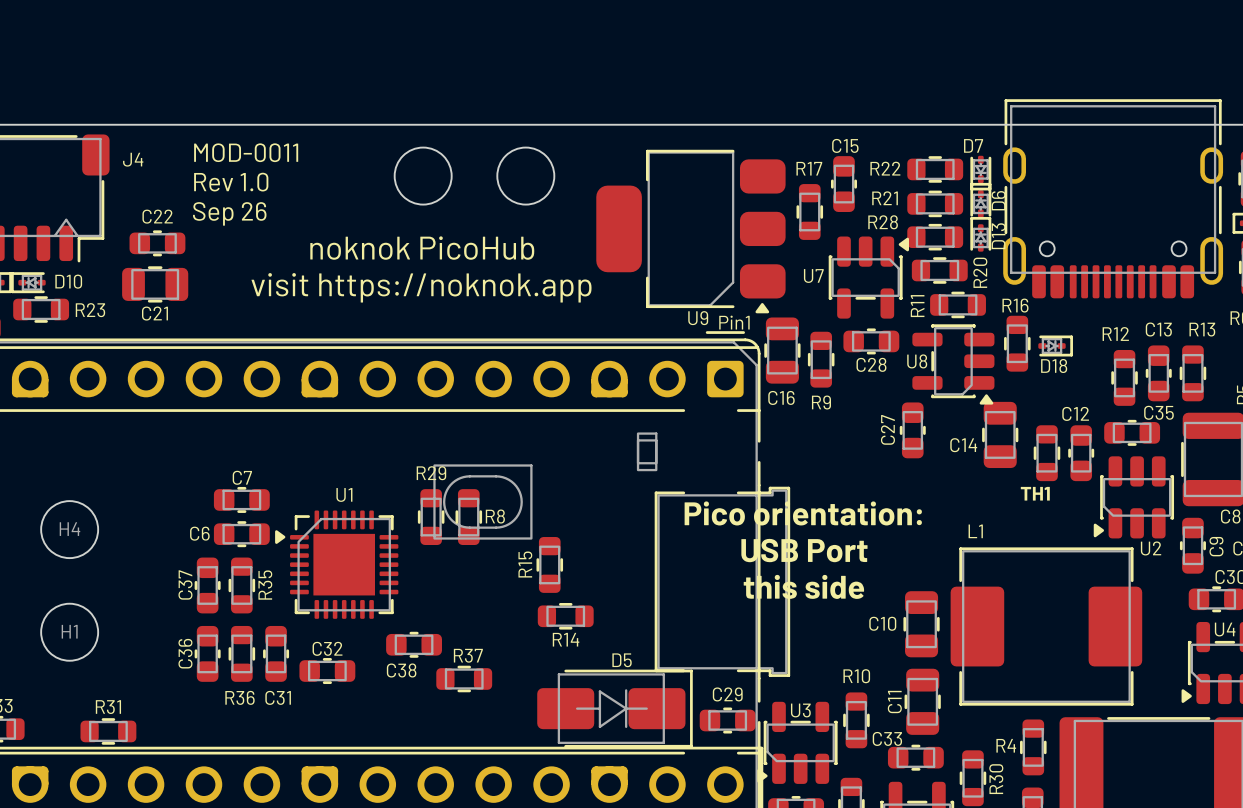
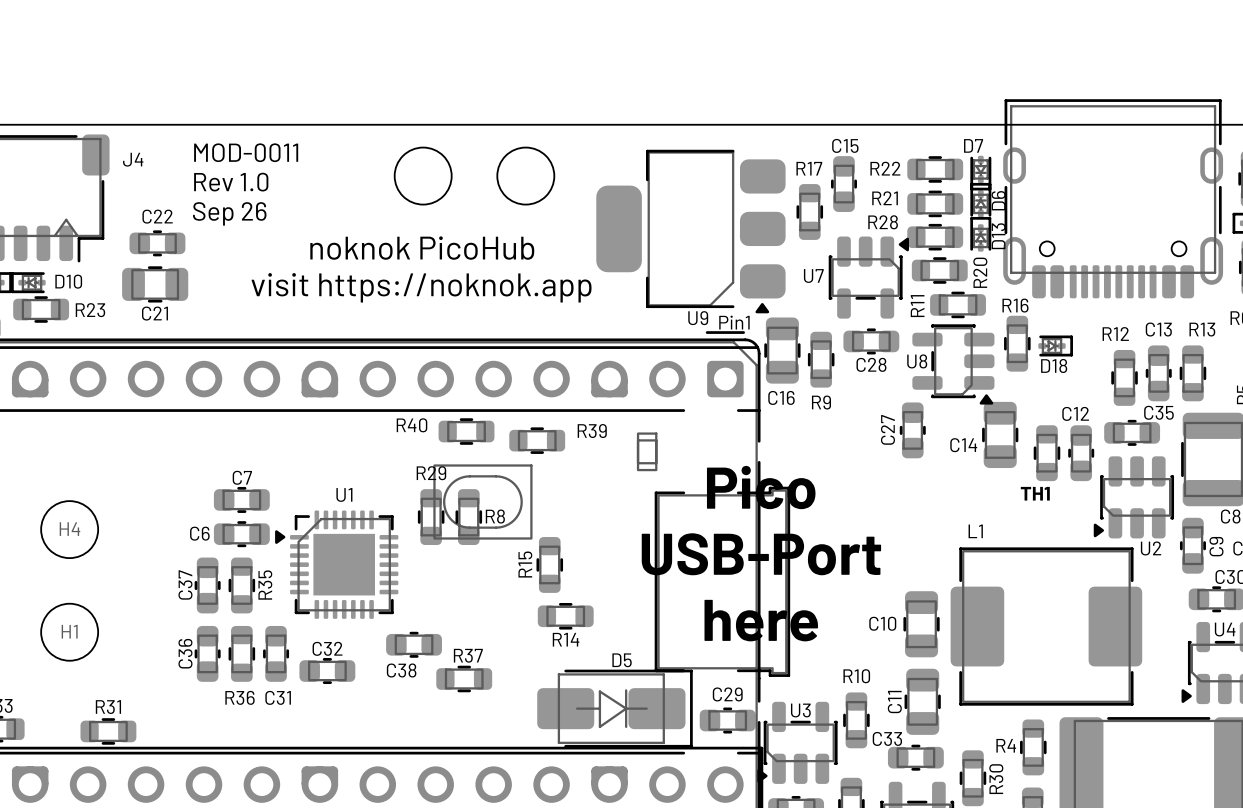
R40: none -> (466, 431)
R39: none -> (537, 440)
text: none -> Pico (761, 487)
text: Pico orientation: (803, 513) -> none
text: USB Port (804, 550) -> USB-Port (761, 554)
text: this side (803, 586) -> none
text: none -> here (761, 620)

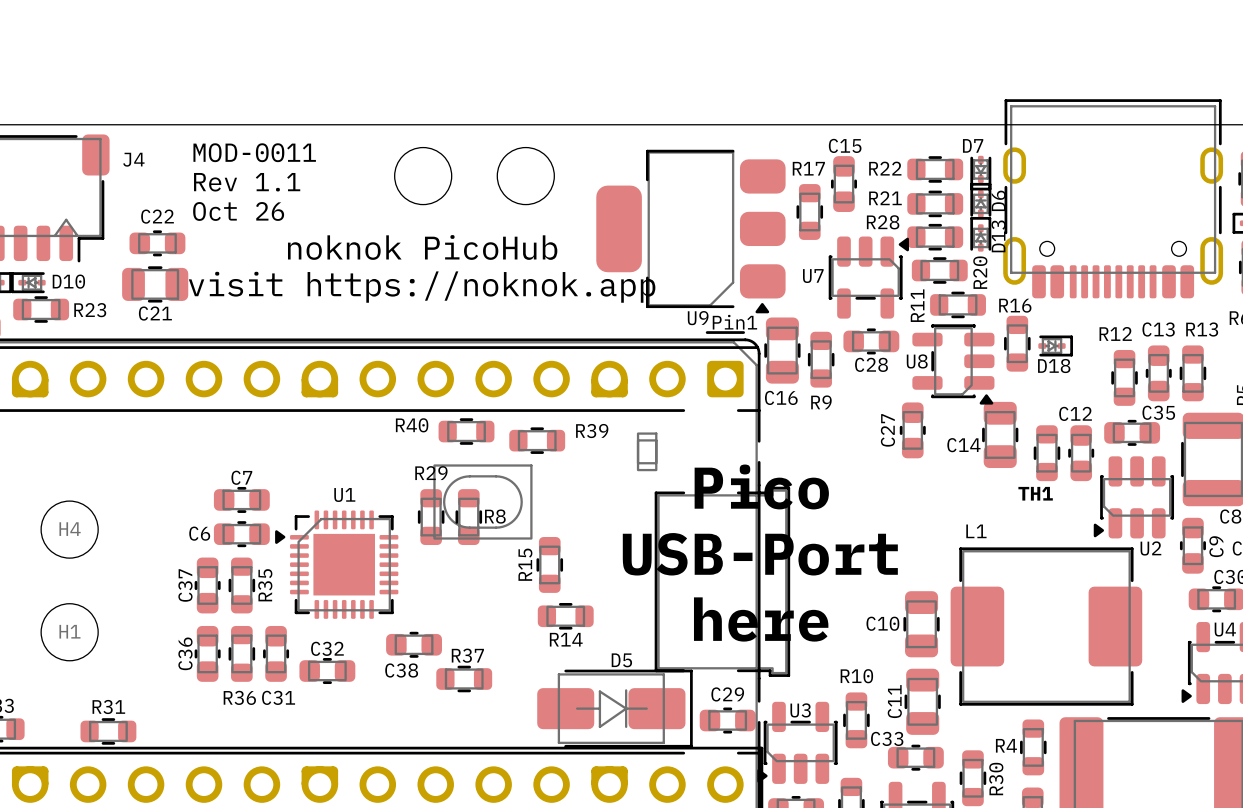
text: Rev 1.0 (231, 182) -> Rev 1.1 (247, 182)
text: Sep 26 (229, 213) -> Oct 26 (238, 211)

